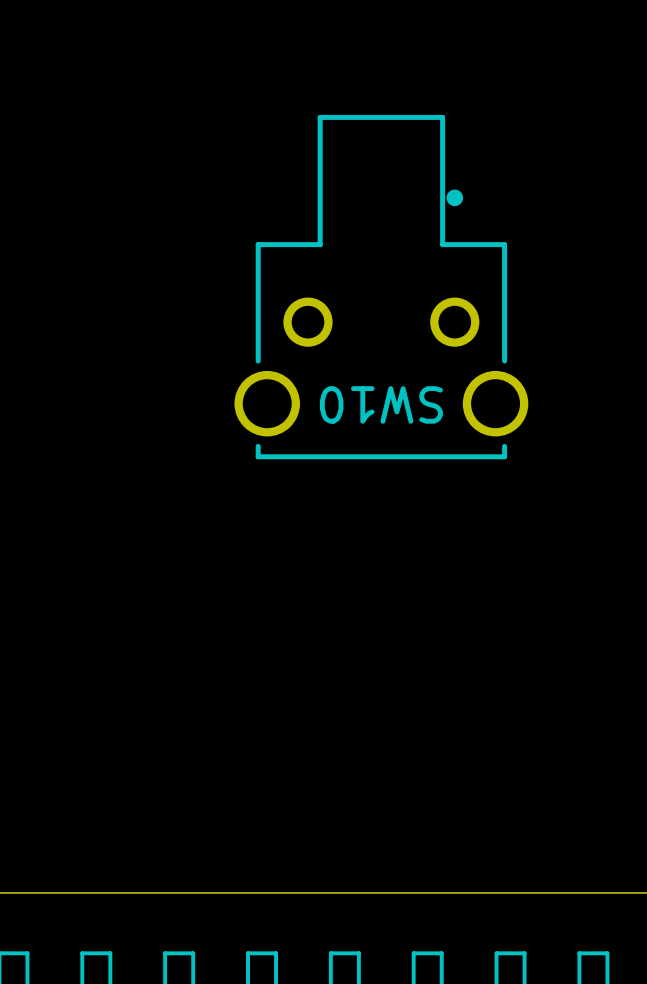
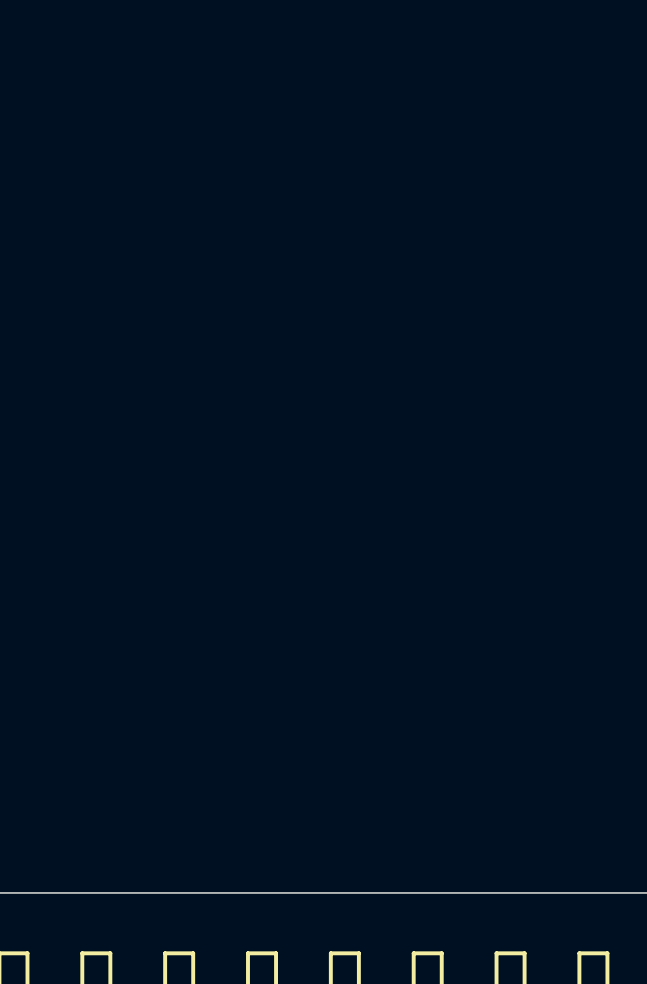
SW10: (381, 287) -> none

